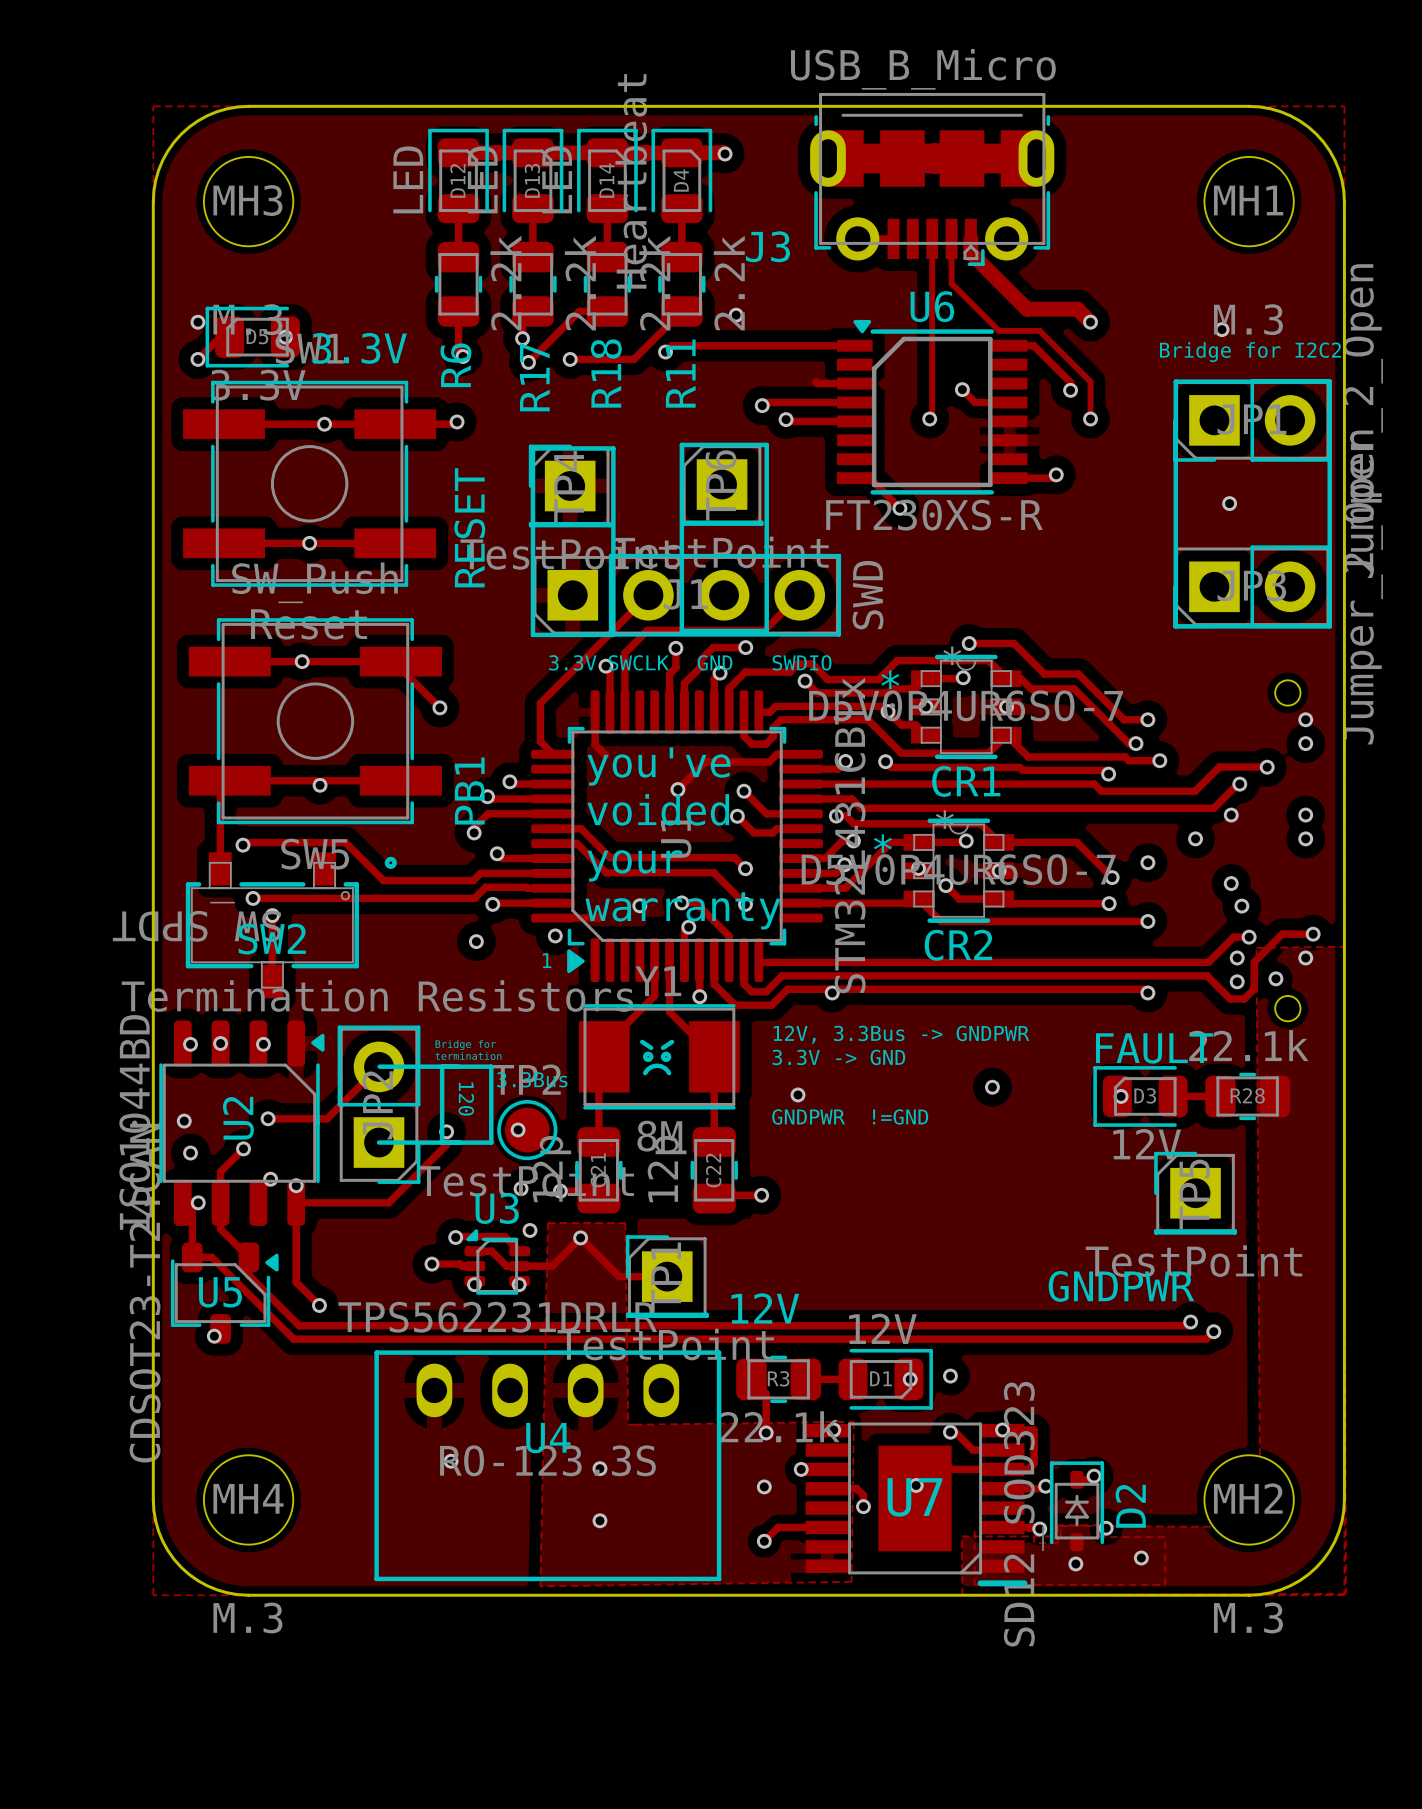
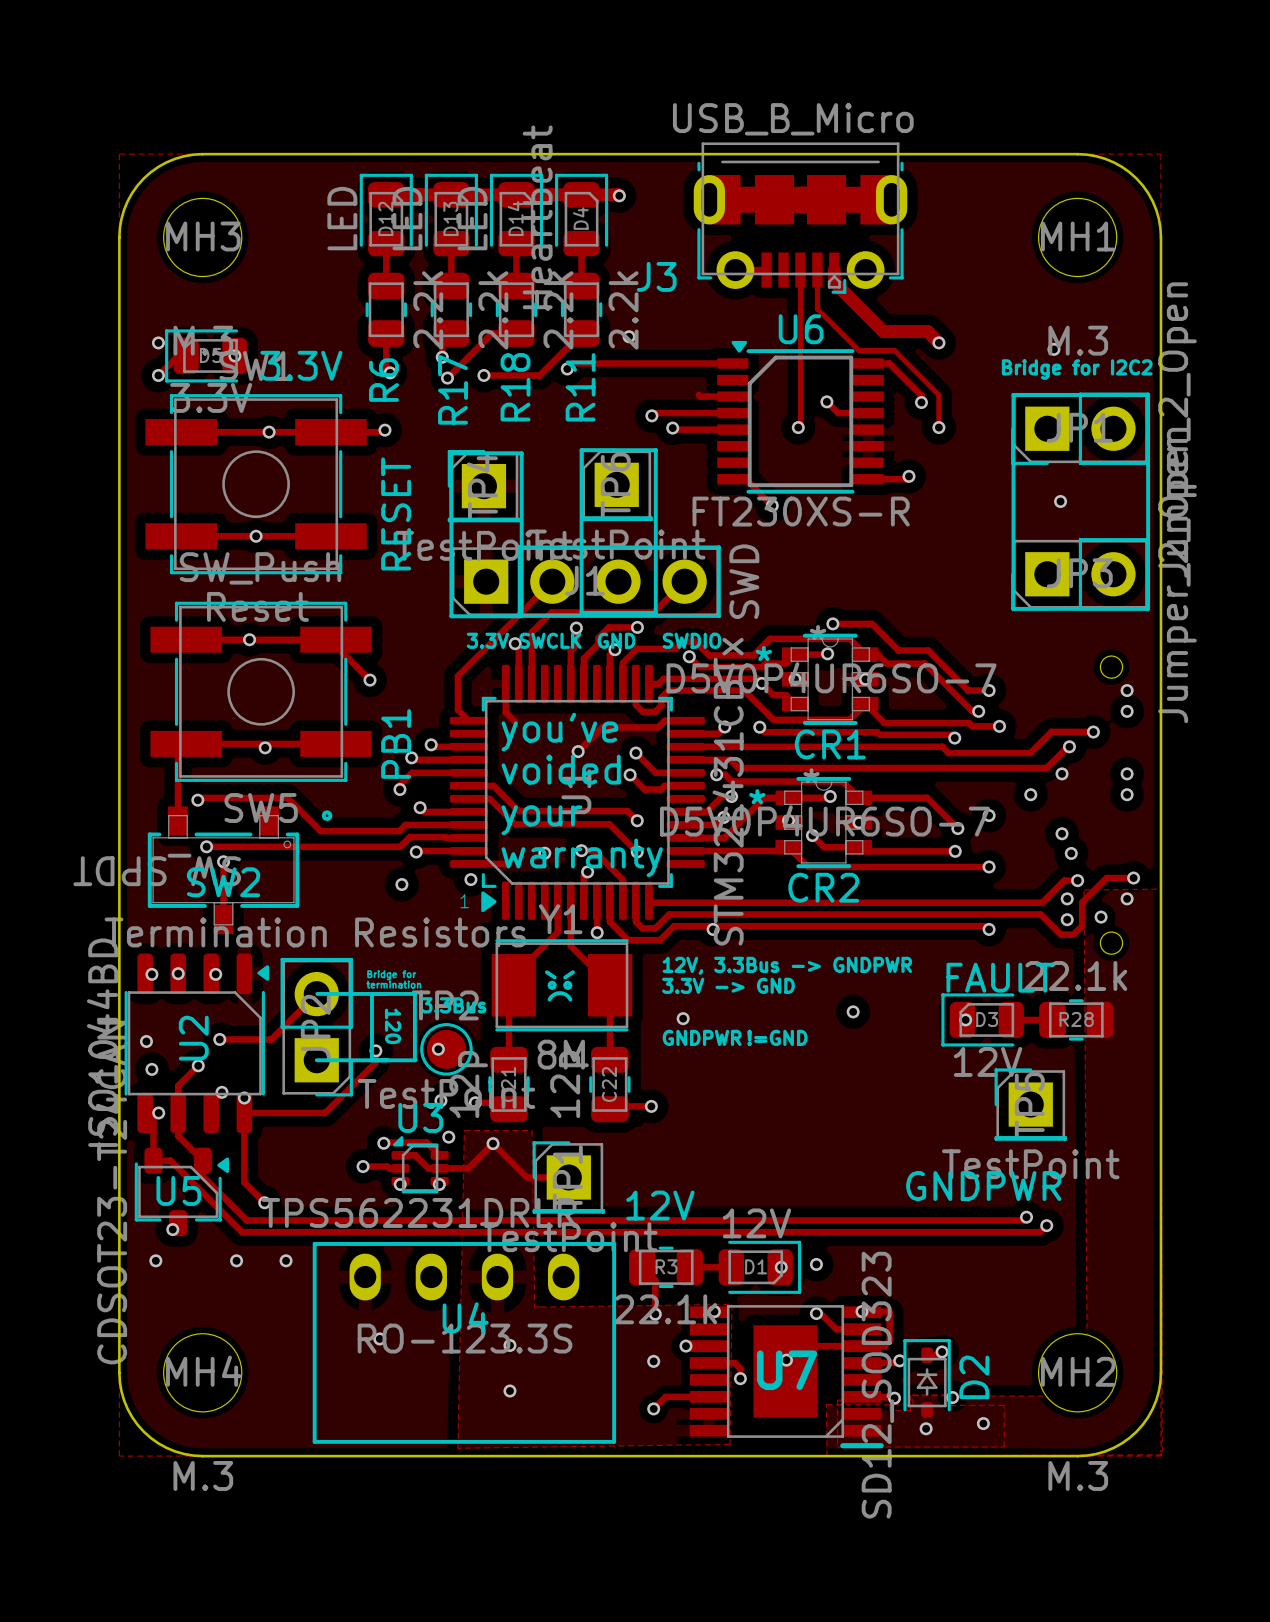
via: none -> (155, 1260)
via: none -> (236, 1260)
via: none -> (286, 1260)

